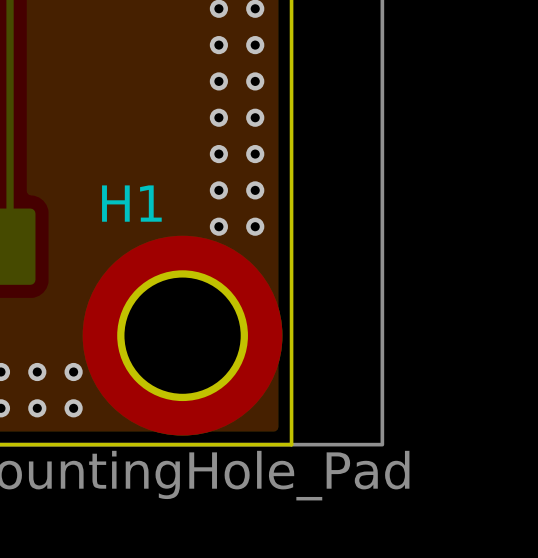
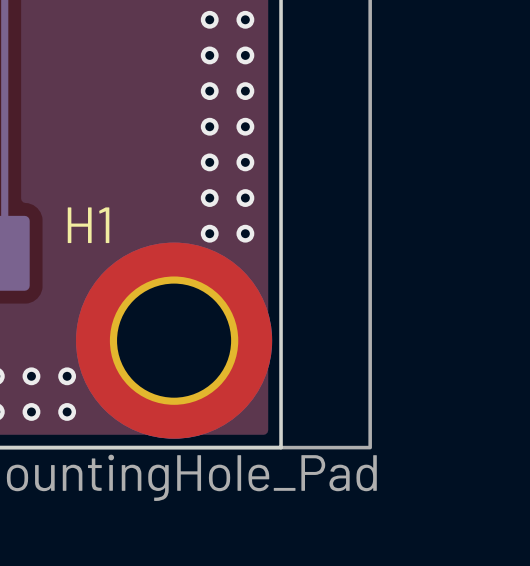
H1 name position: H1 (131, 203) -> H1 (88, 225)

